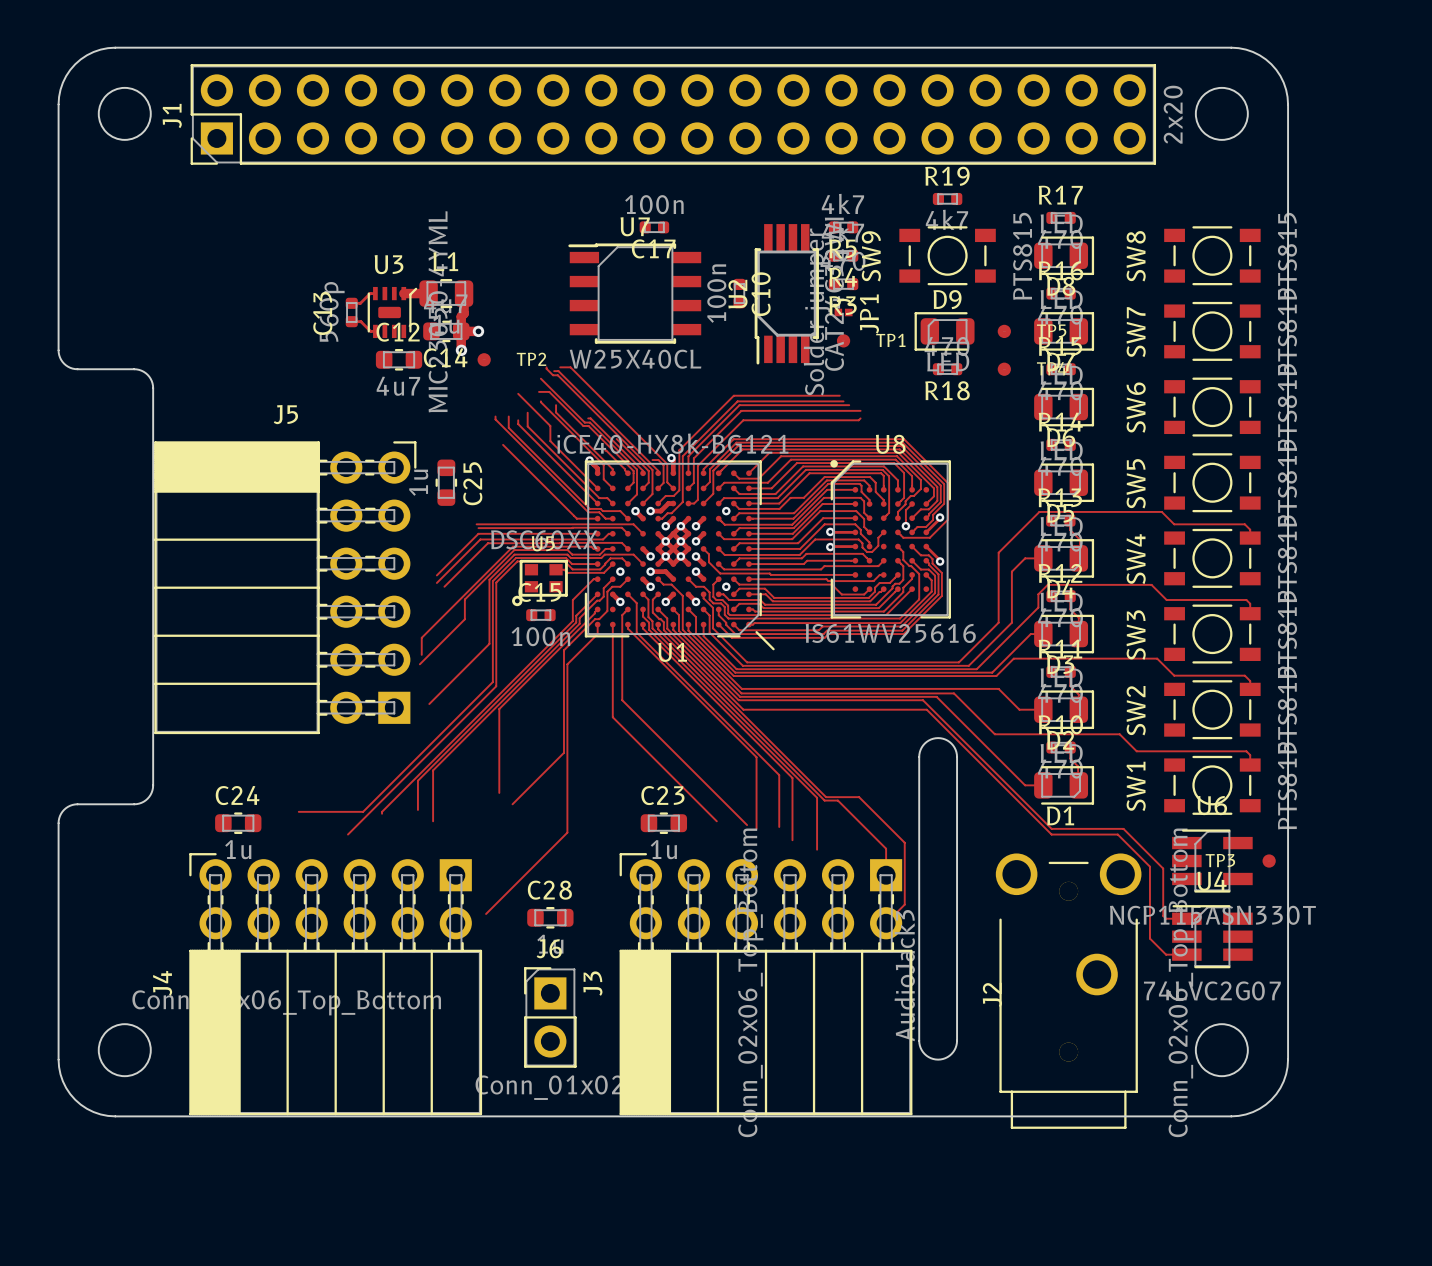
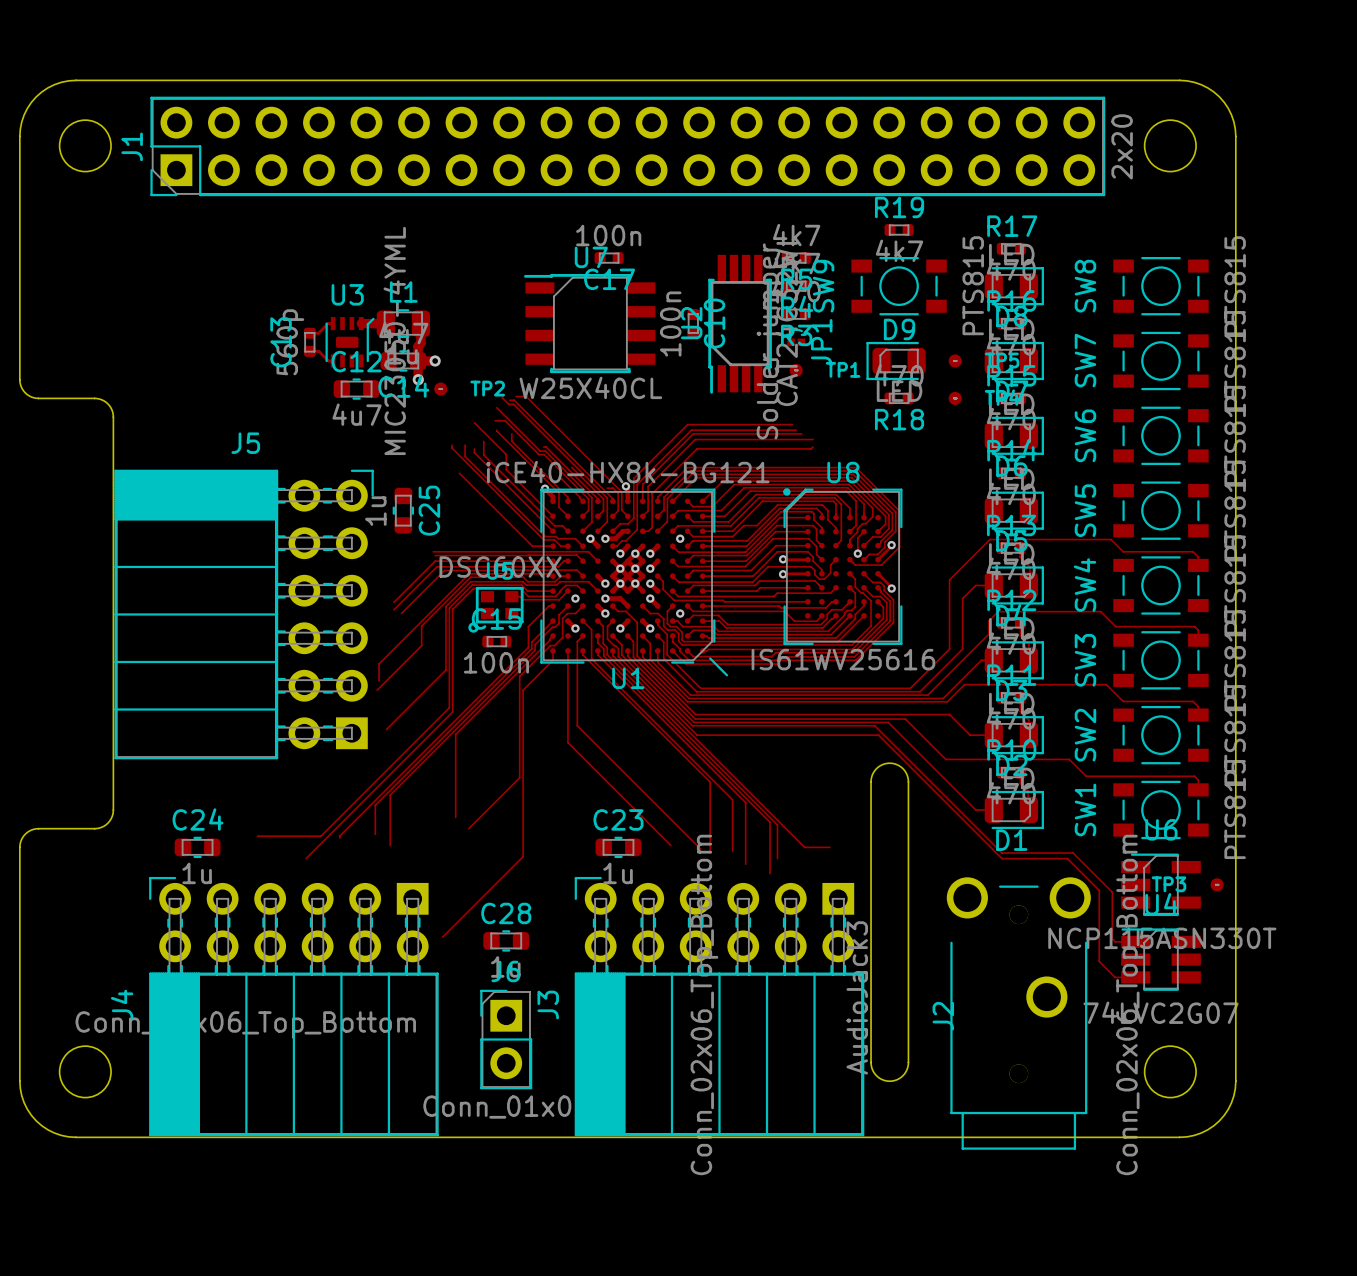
track: (826, 797) (859, 797) (904, 842) (904, 904) (886, 923) -> (778, 821) (804, 847) (829, 847)
track: (824, 800) (837, 800) (886, 848) (886, 875) -> (777, 824) (777, 858)

